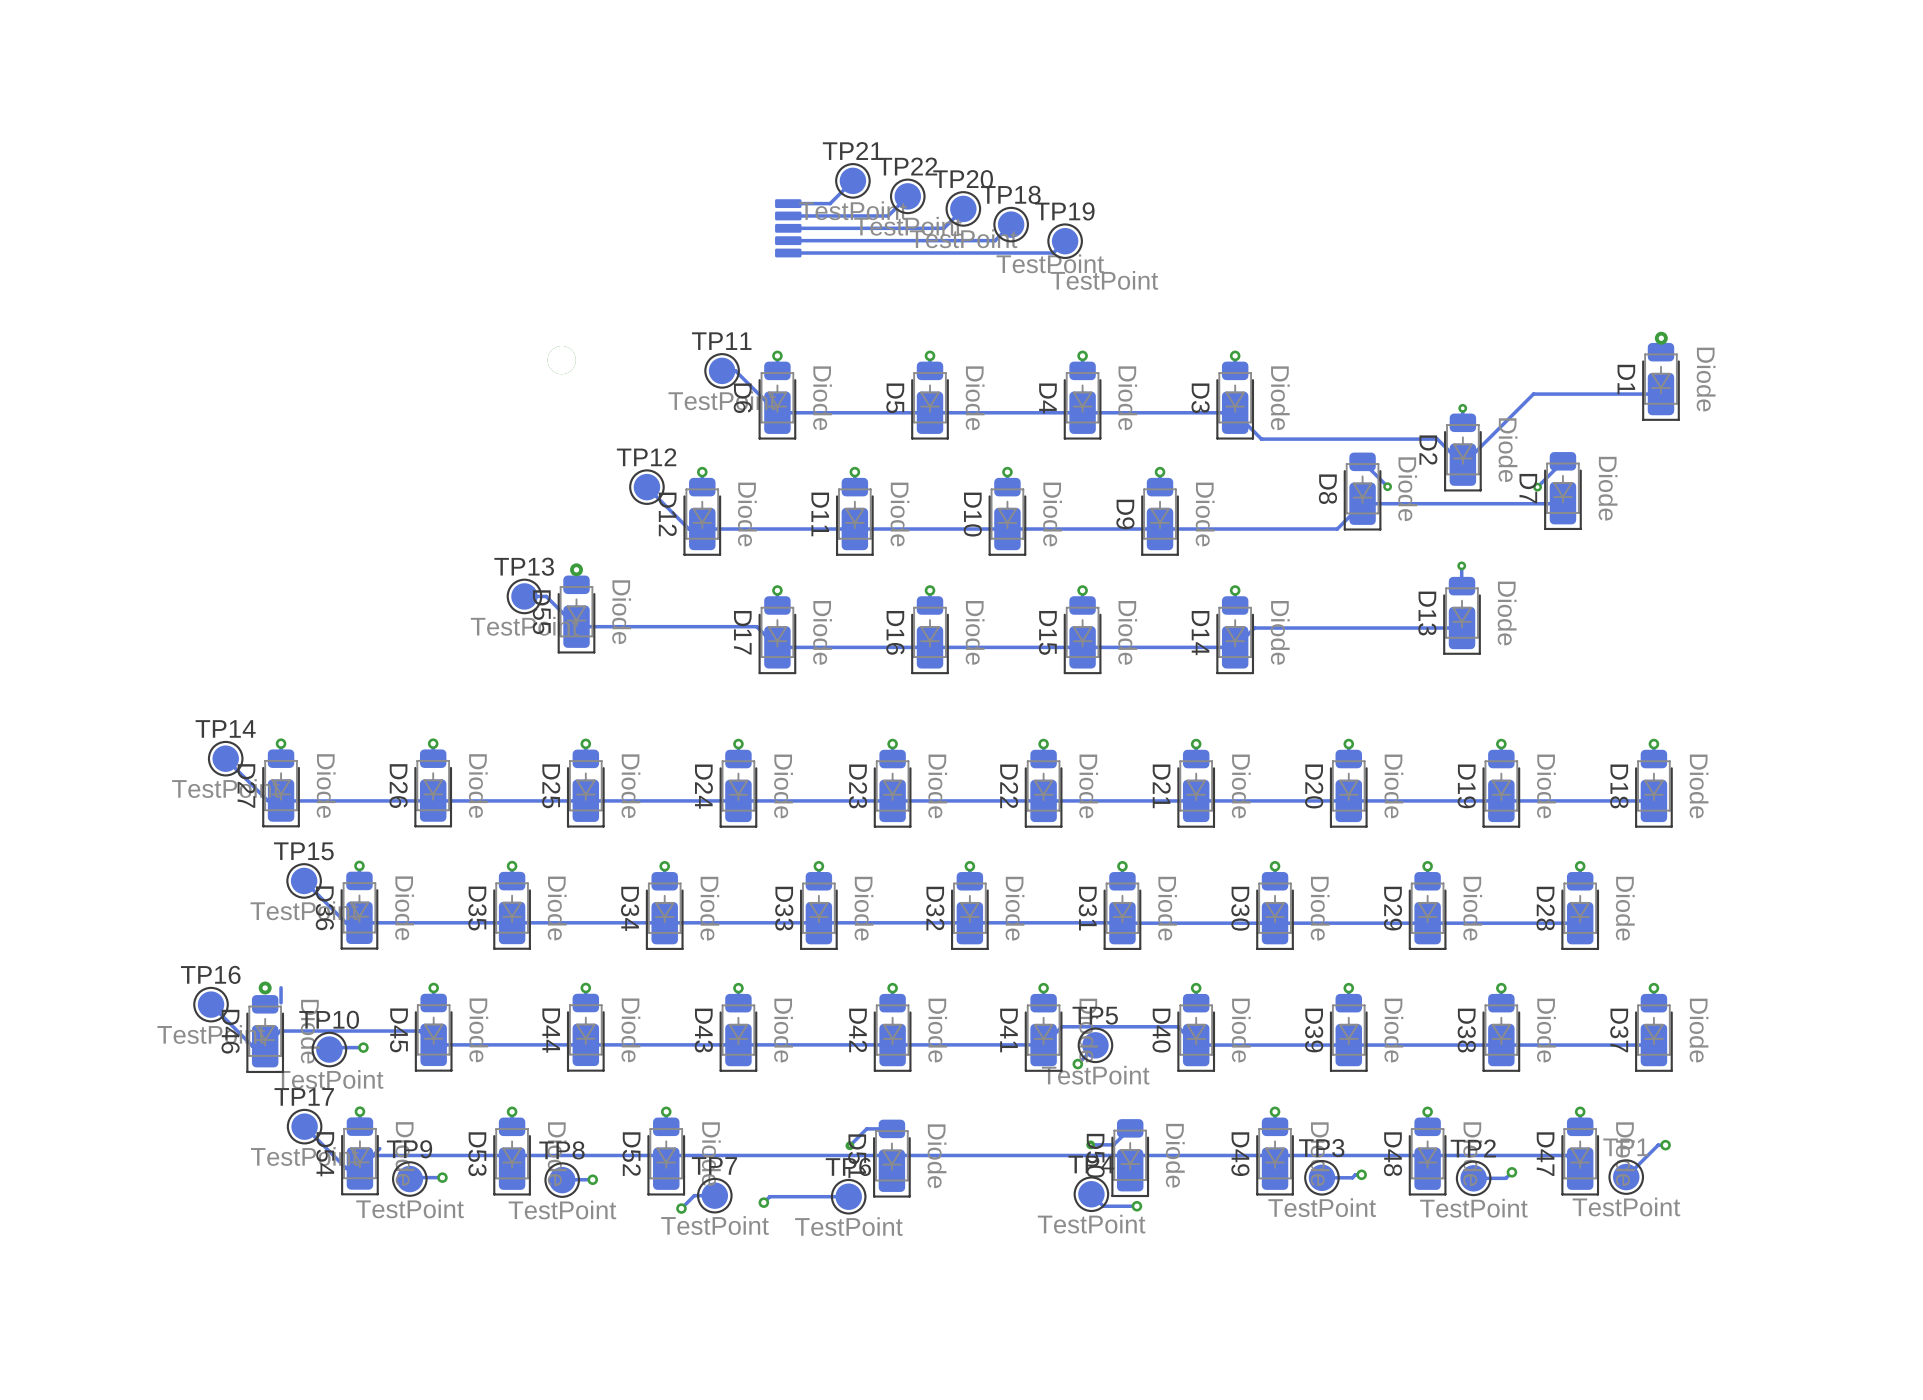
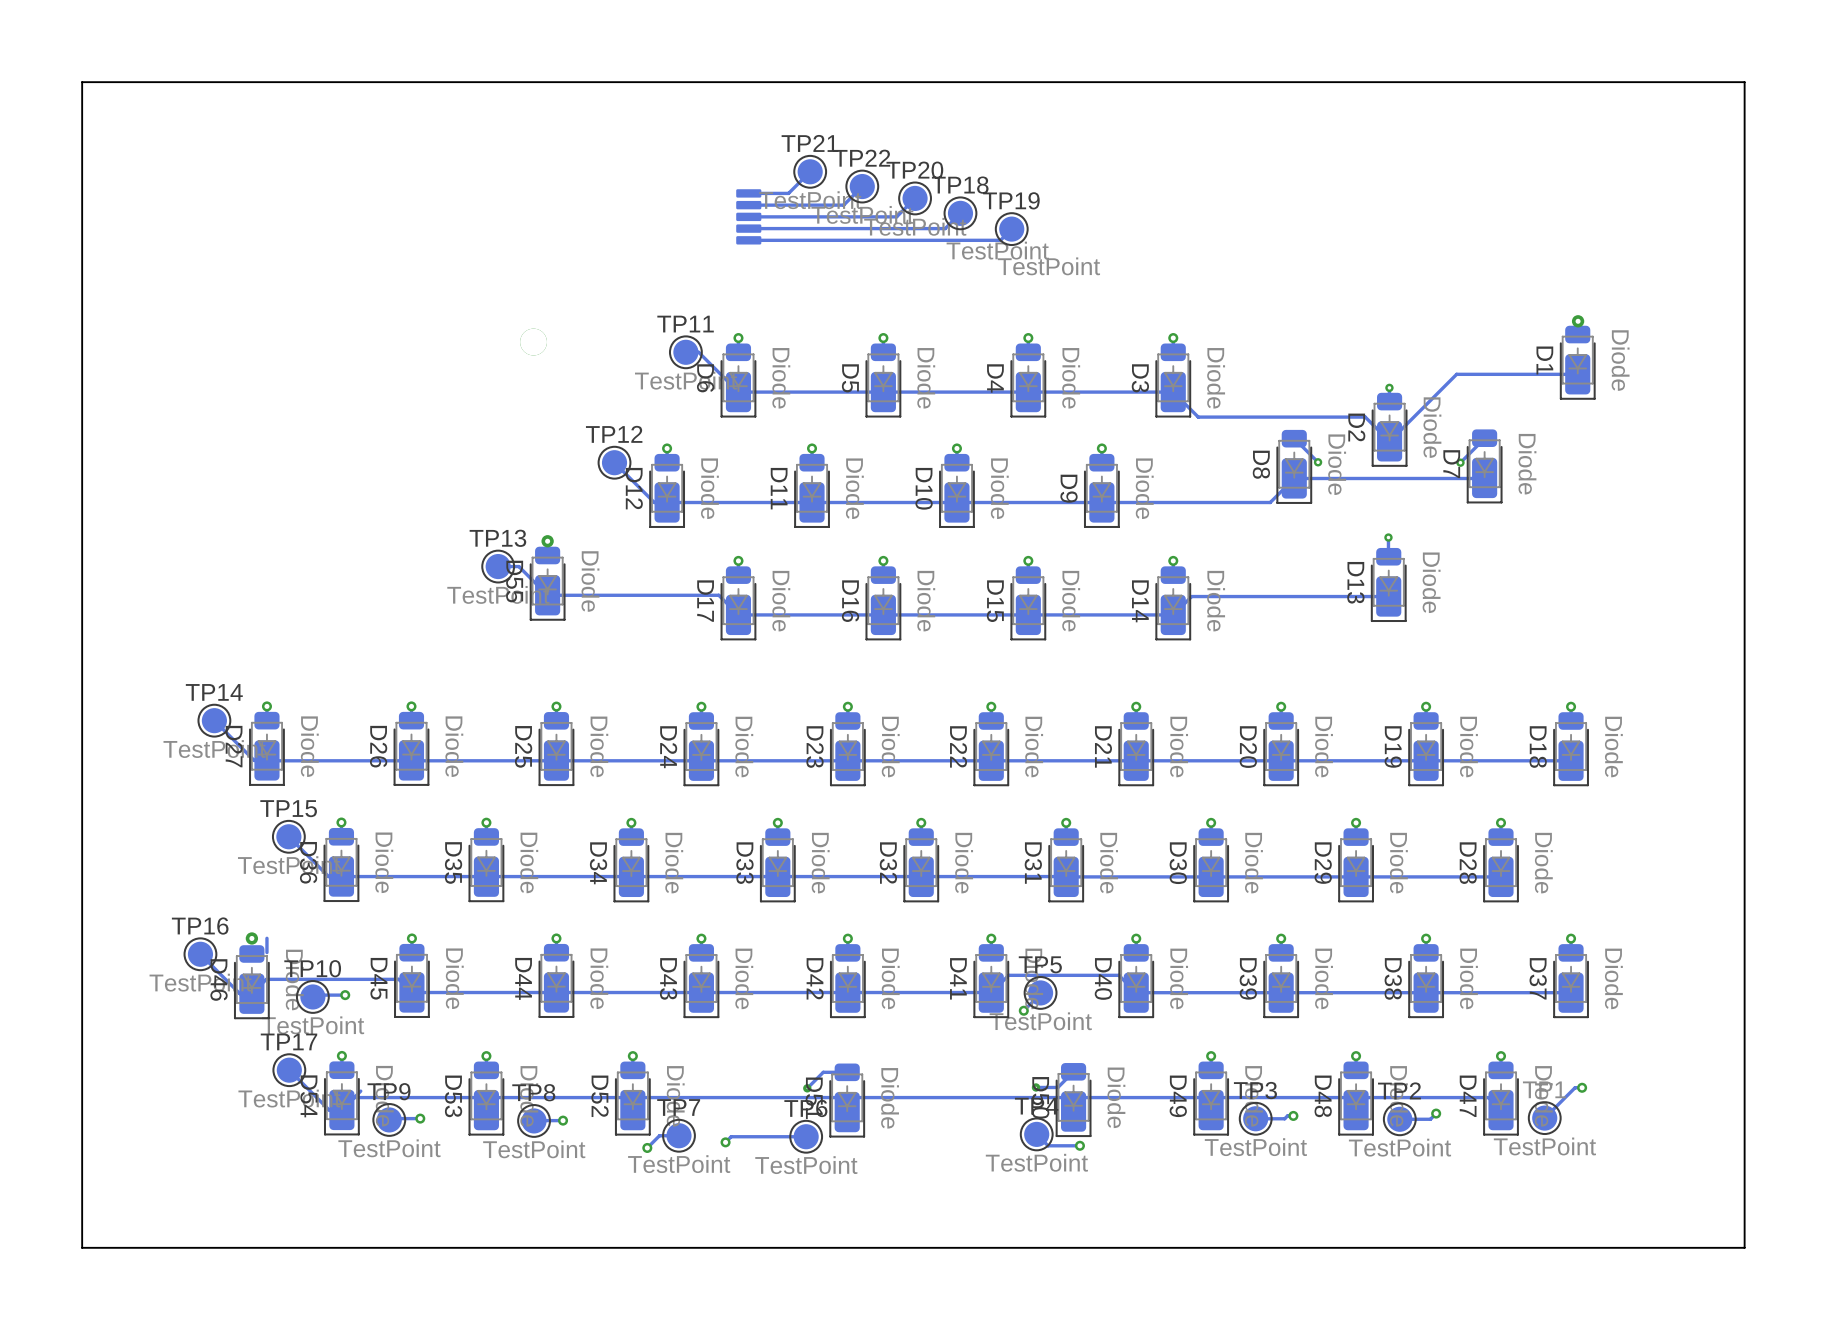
board edge: none -> (1744, 82) (82, 82) (82, 1247) (1744, 1247) (1744, 82)

